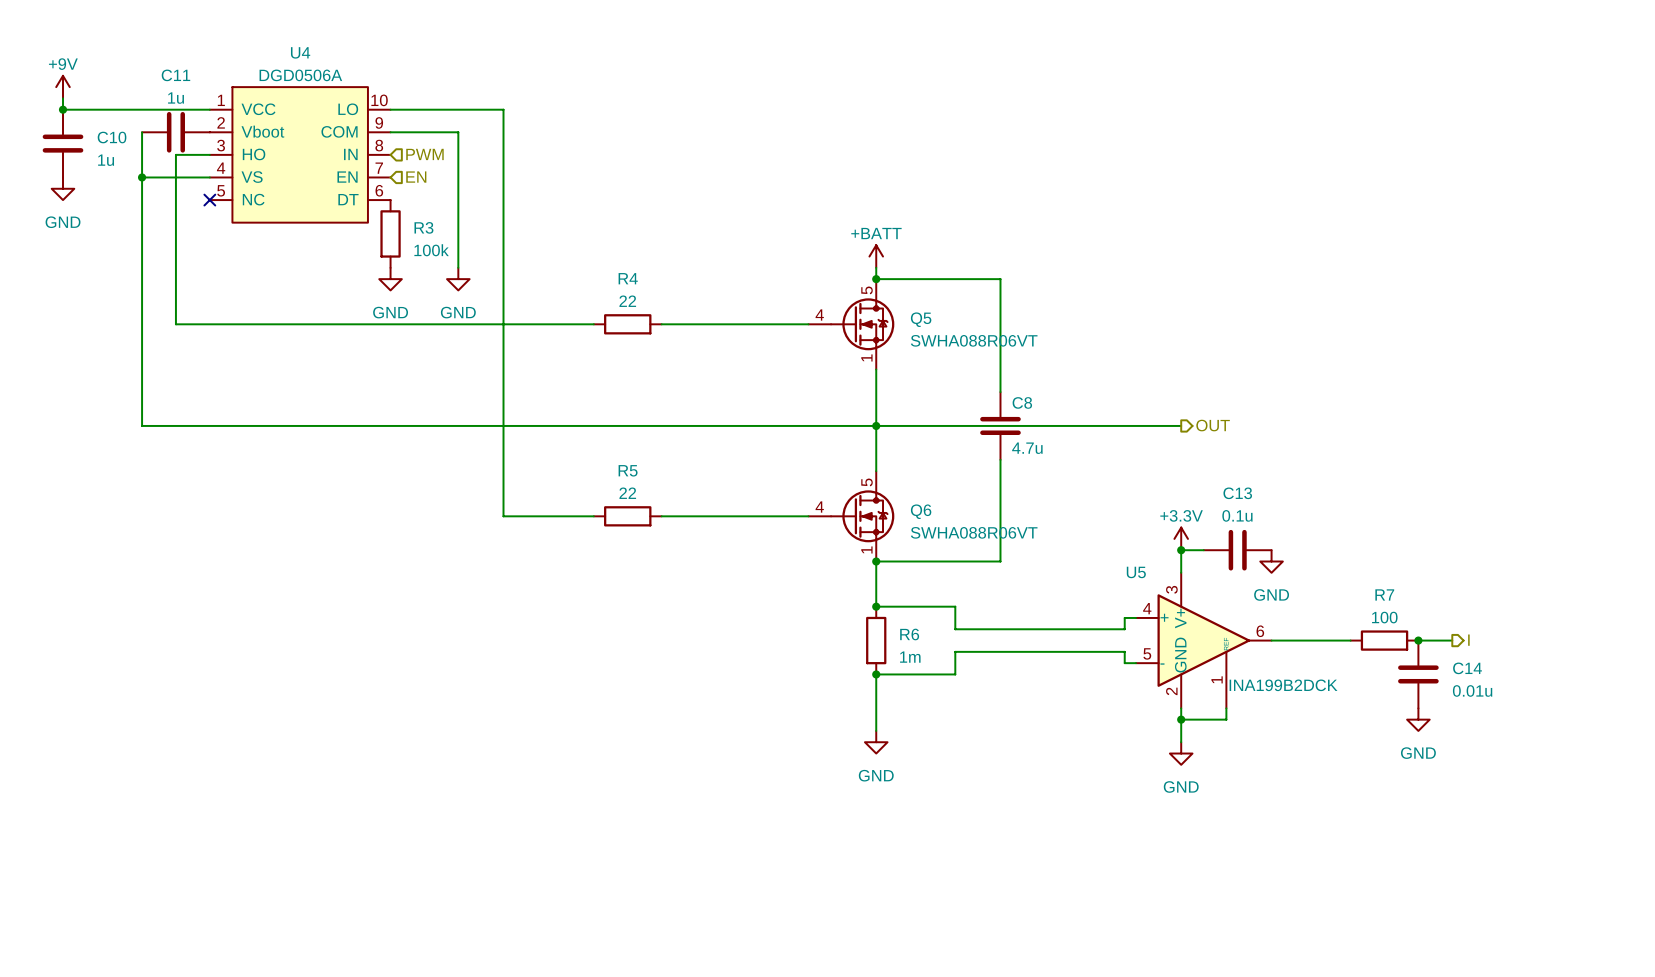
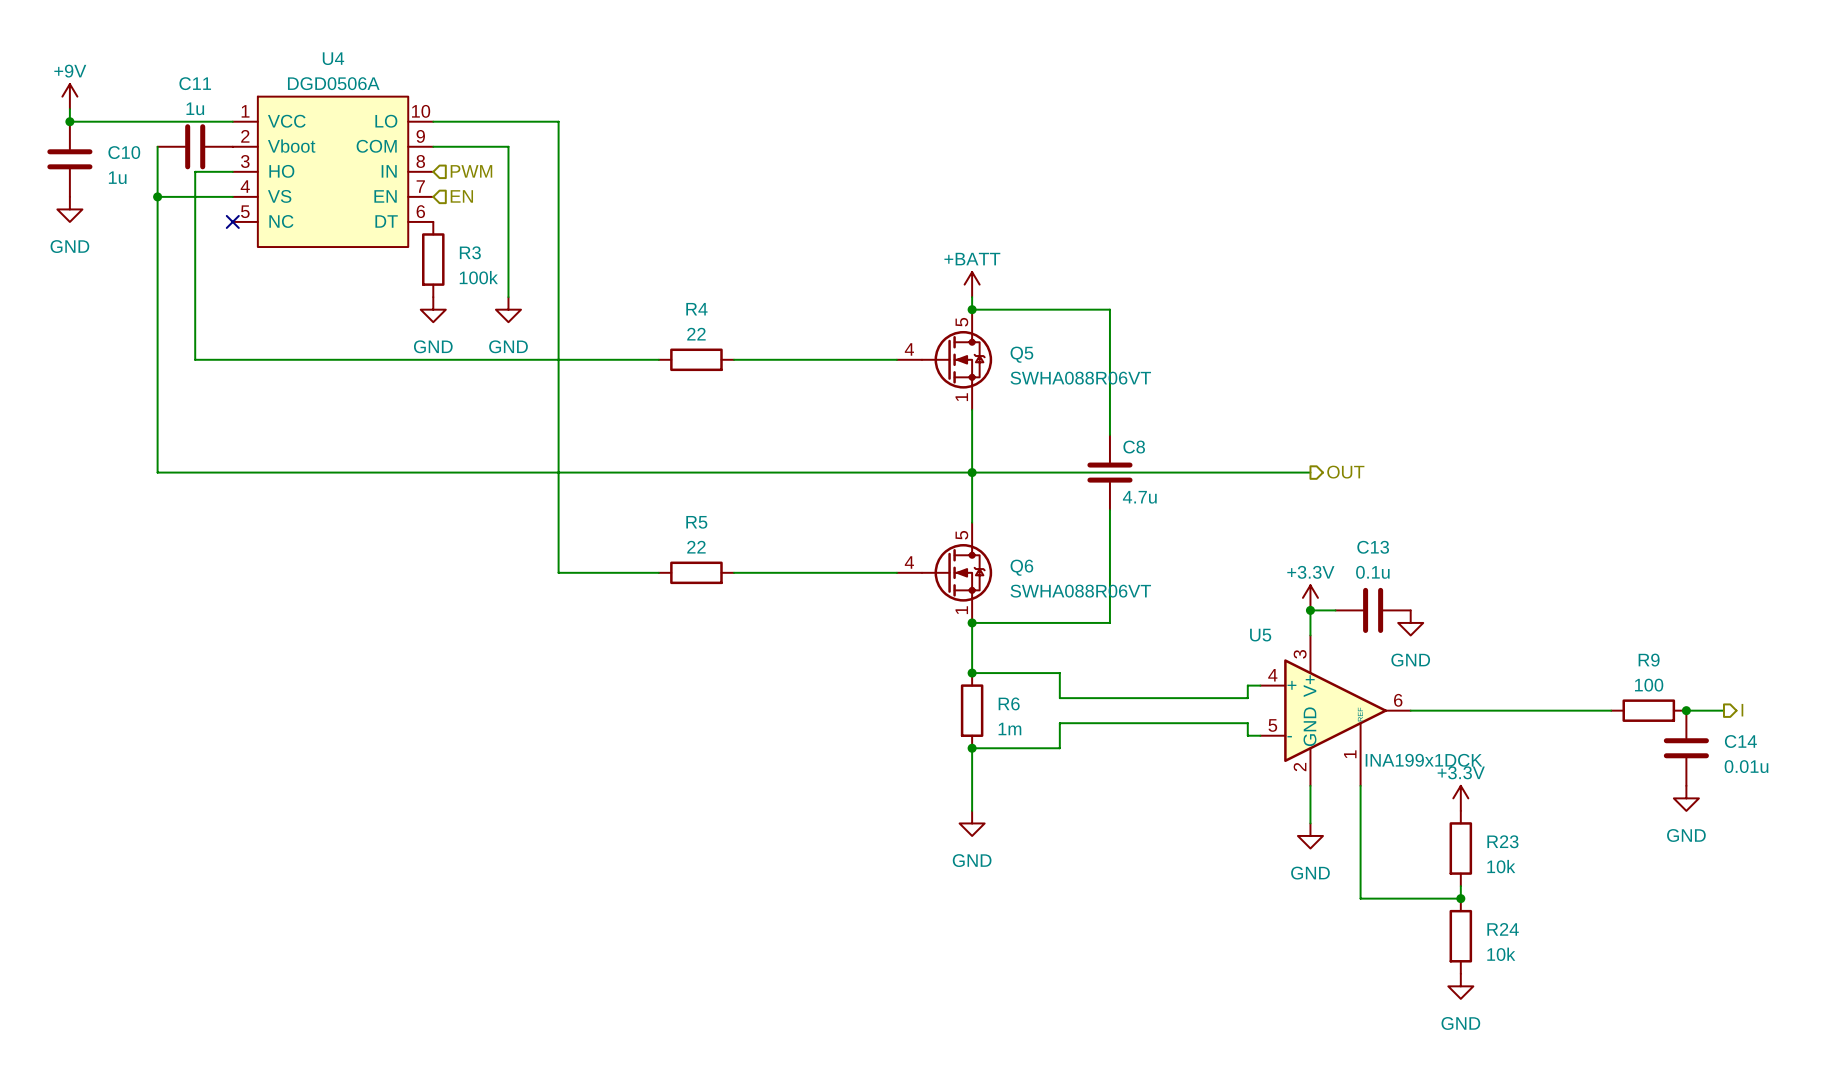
wire: none -> (1498, 710) (1573, 710)
R7: 100 (1384, 640) -> none
junction: (1418, 640) -> none
hierarchical label position: I (1468, 640) -> I (1742, 710)
R9: none -> 100 (1648, 710)
wire: none -> (1686, 710) (1723, 710)
junction: none -> (1686, 710)
C14 position: (1418, 674) -> (1686, 748)
U5 value: INA199B2DCK (1283, 685) -> INA199x1DCK (1423, 760)
wire: (1181, 719) (1226, 719) -> (1460, 886) (1460, 898) (1360, 898) (1360, 798)
junction: (1181, 719) -> none
power symbol: none -> +3.3V (1460, 798)
power symbol: GND (1418, 719) -> none
power symbol: none -> GND (1686, 798)
R23: none -> 10k (1460, 848)
junction: none -> (1460, 898)
R24: none -> 10k (1460, 936)
power symbol: none -> GND (1460, 986)

